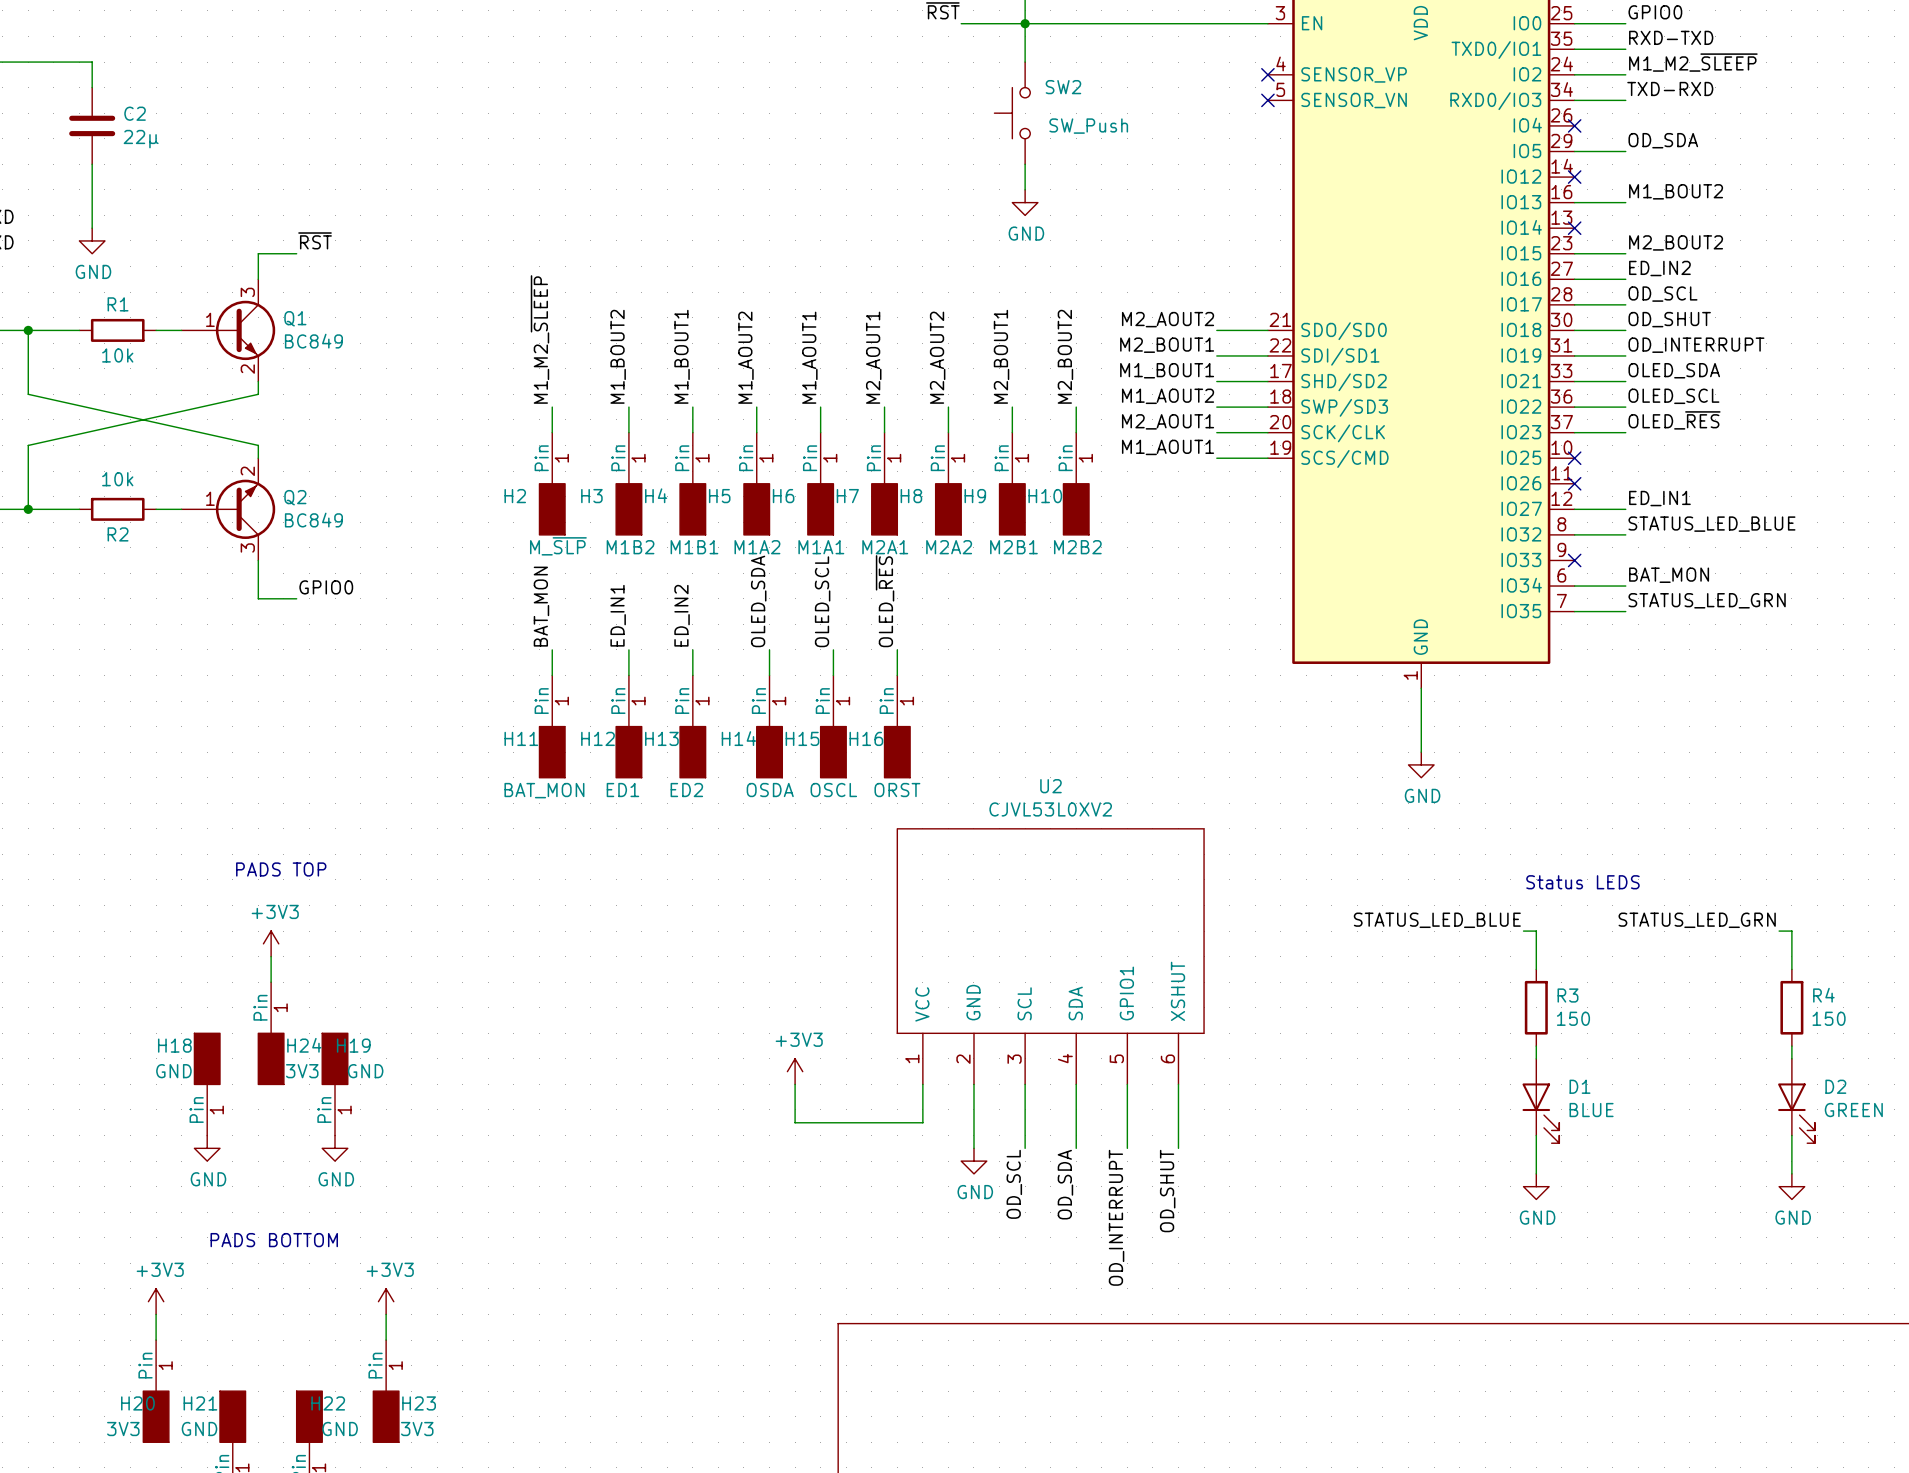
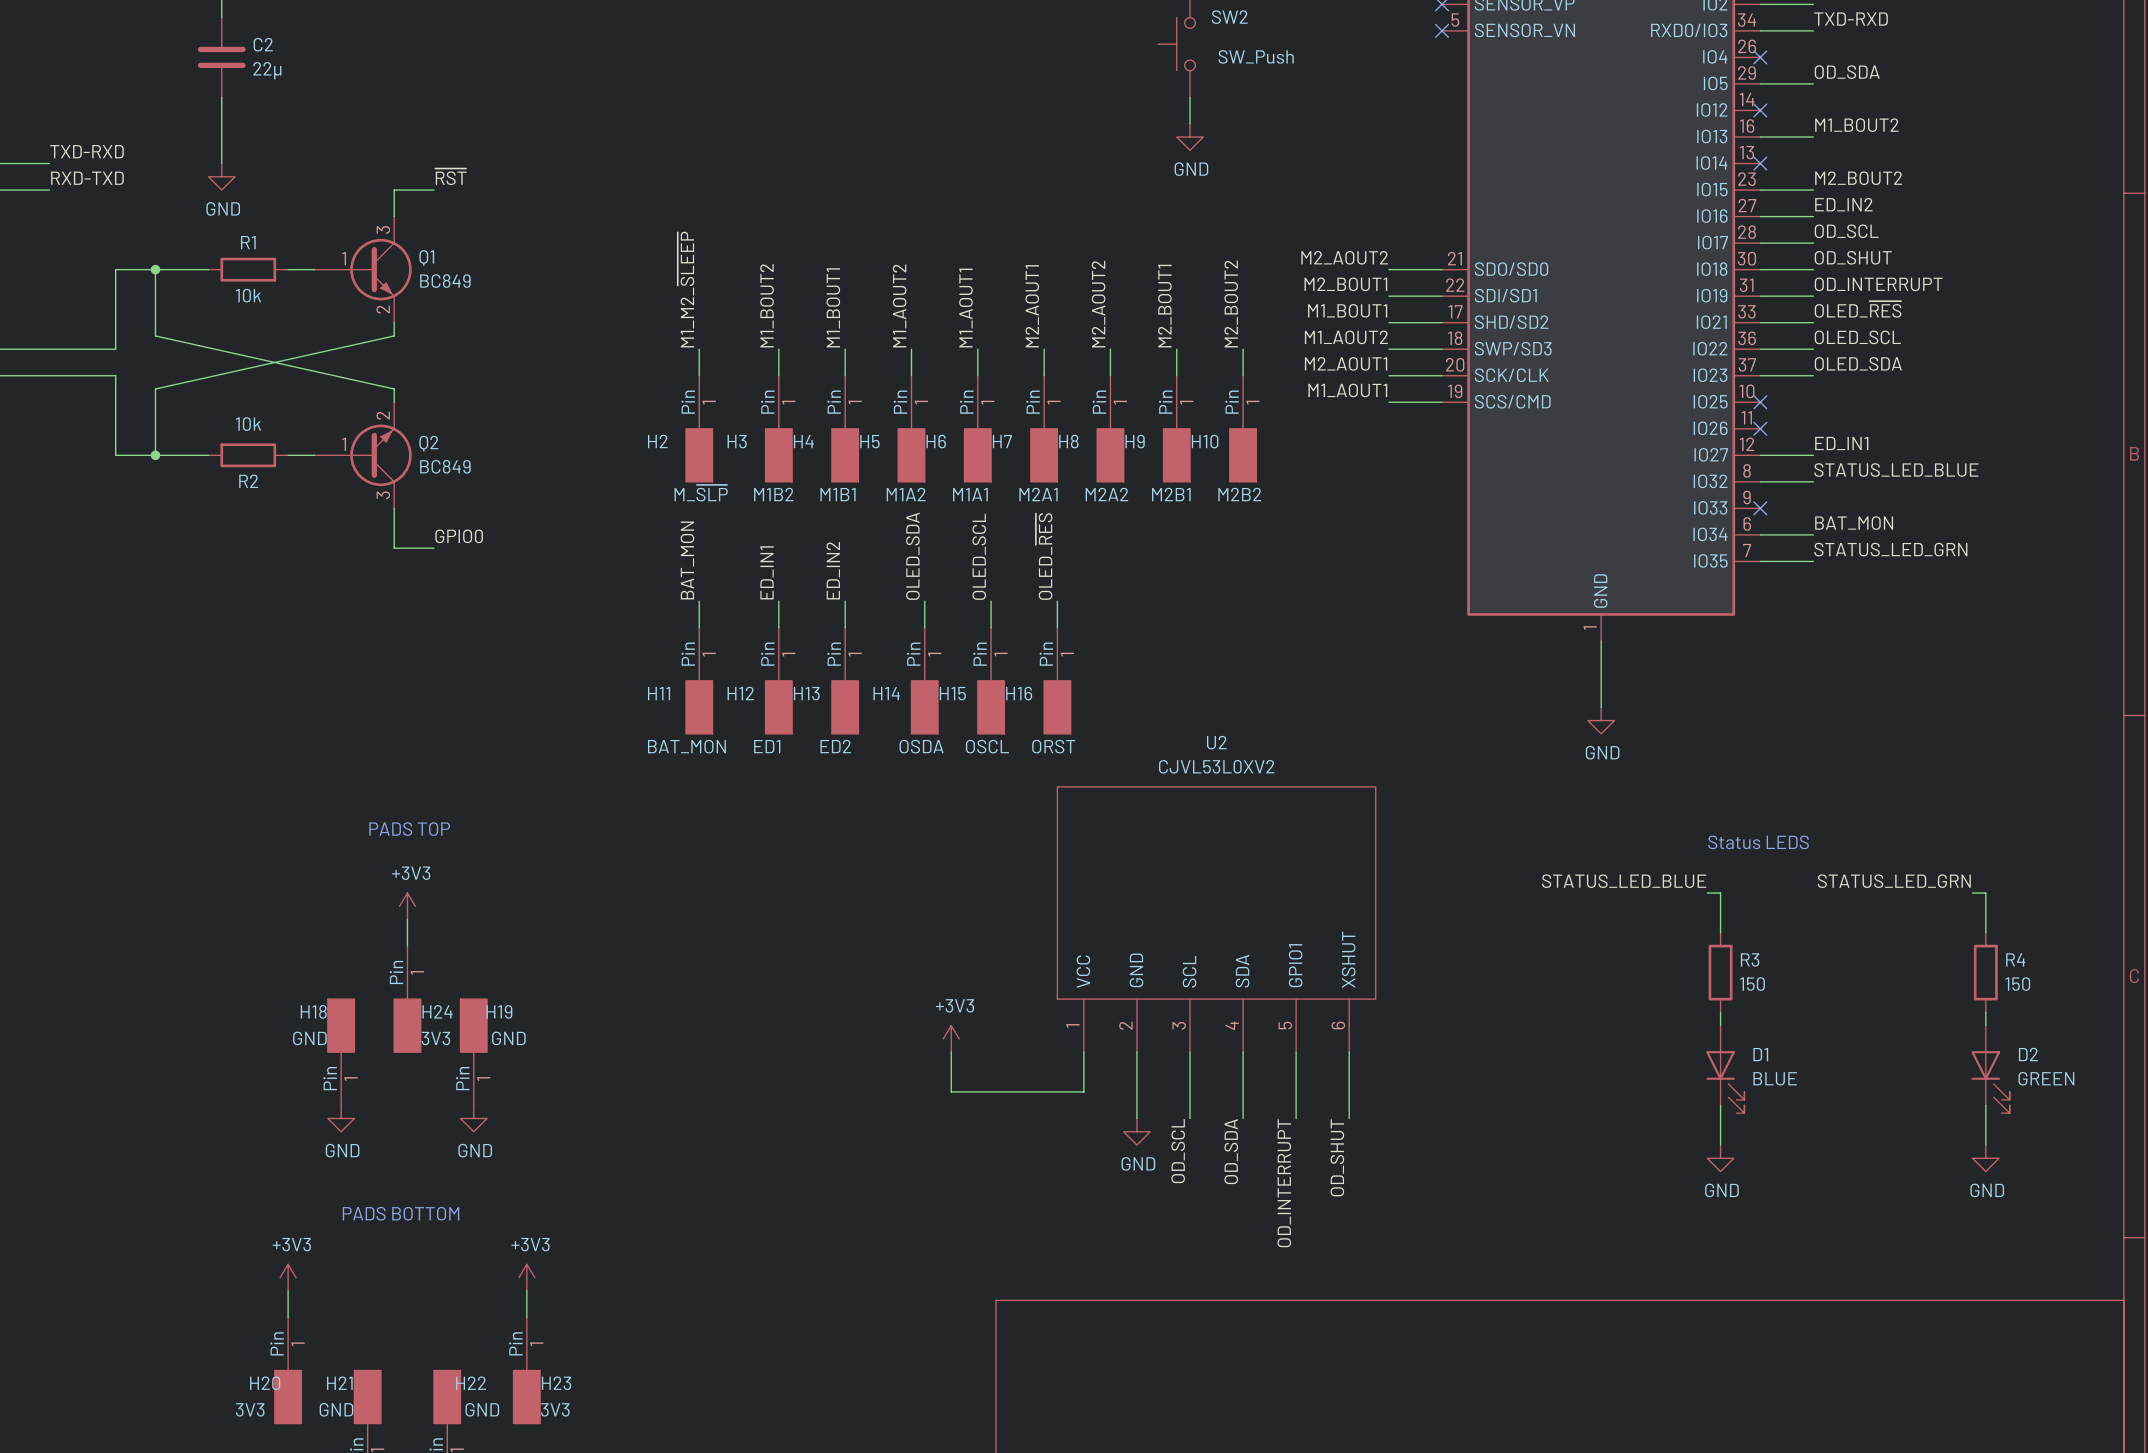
label: OLED_SDA (1674, 370) -> OLED_~{RES} (1858, 309)
label: OLED_~{RES} (1674, 420) -> OLED_SDA (1858, 363)

